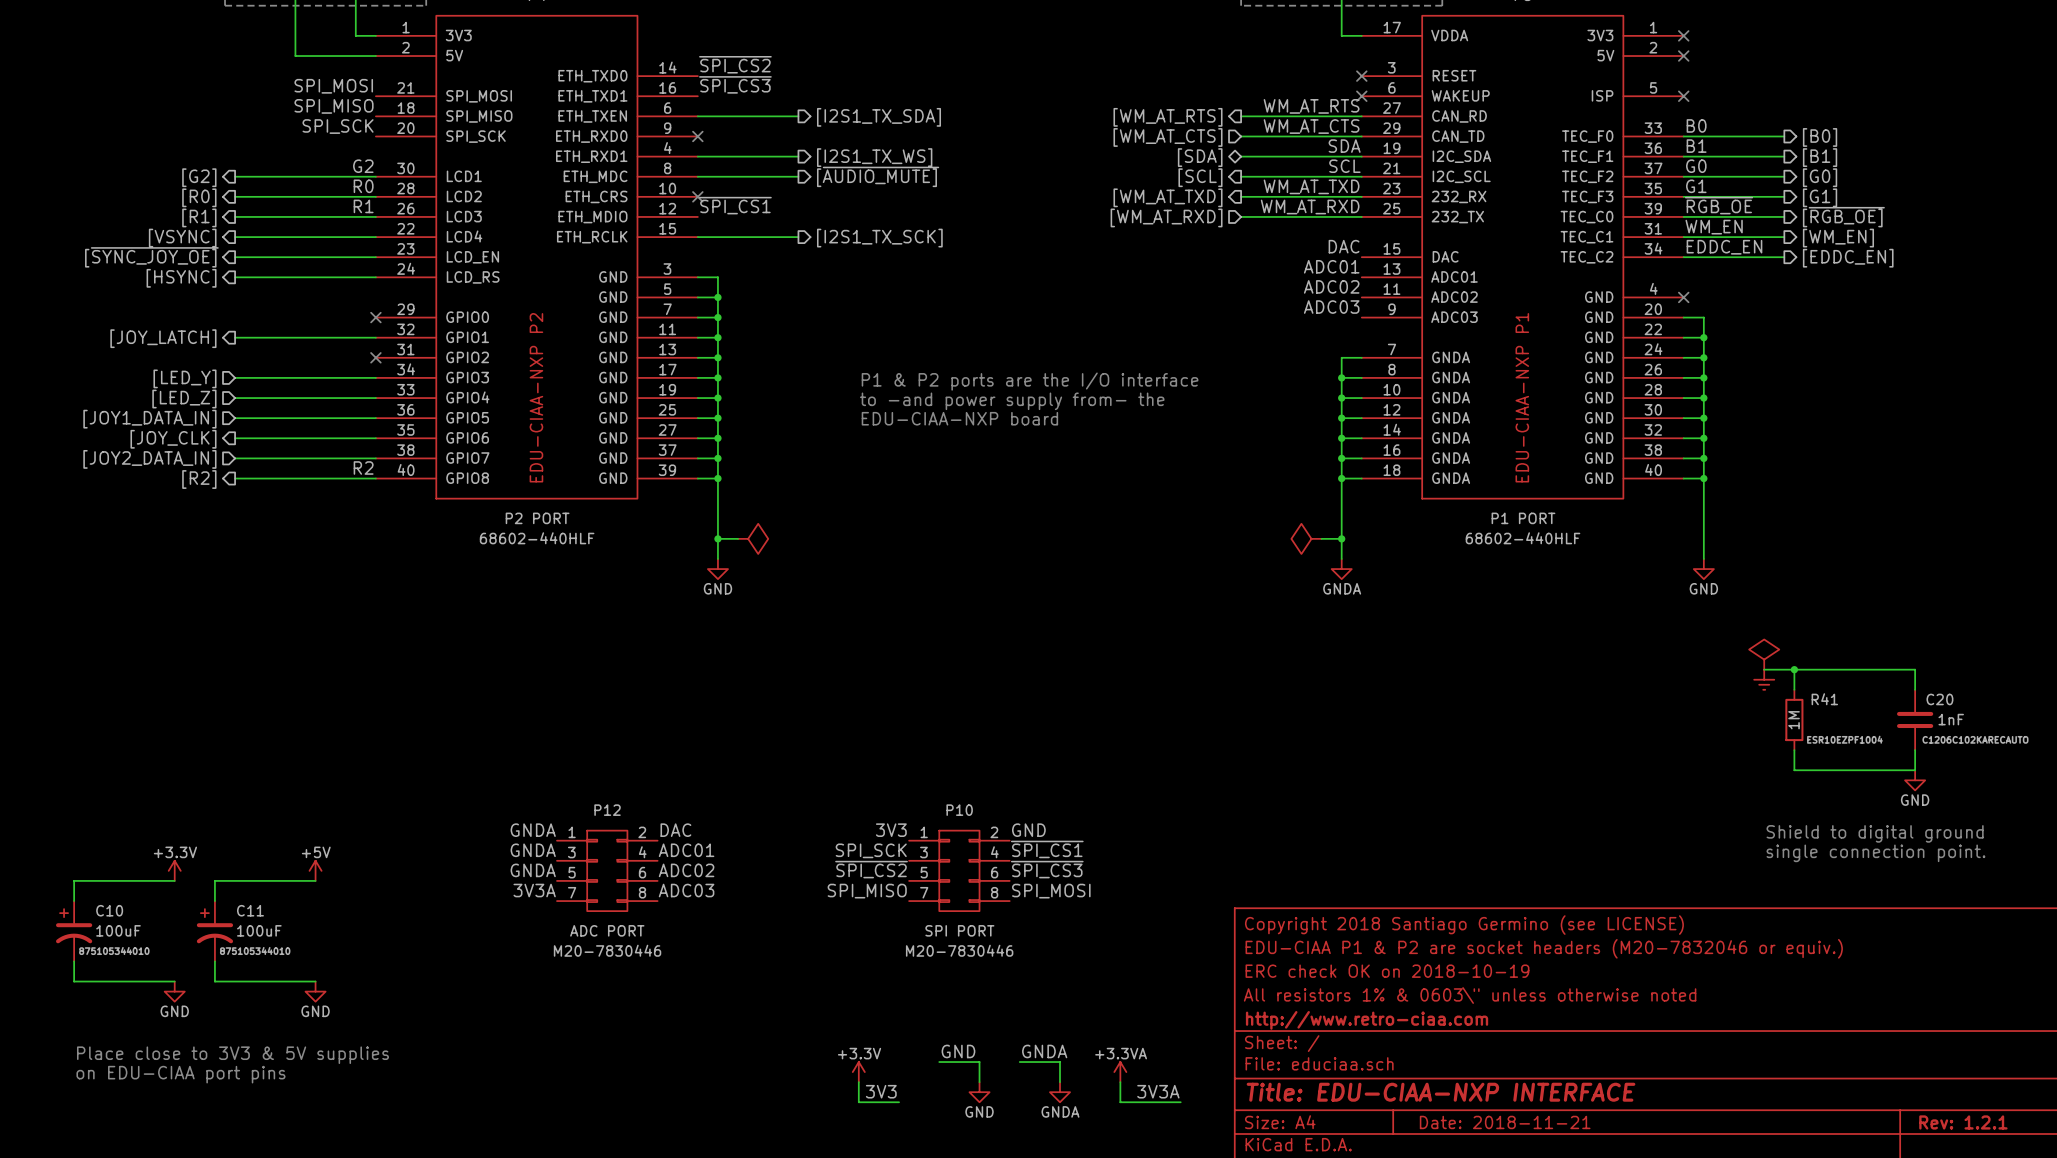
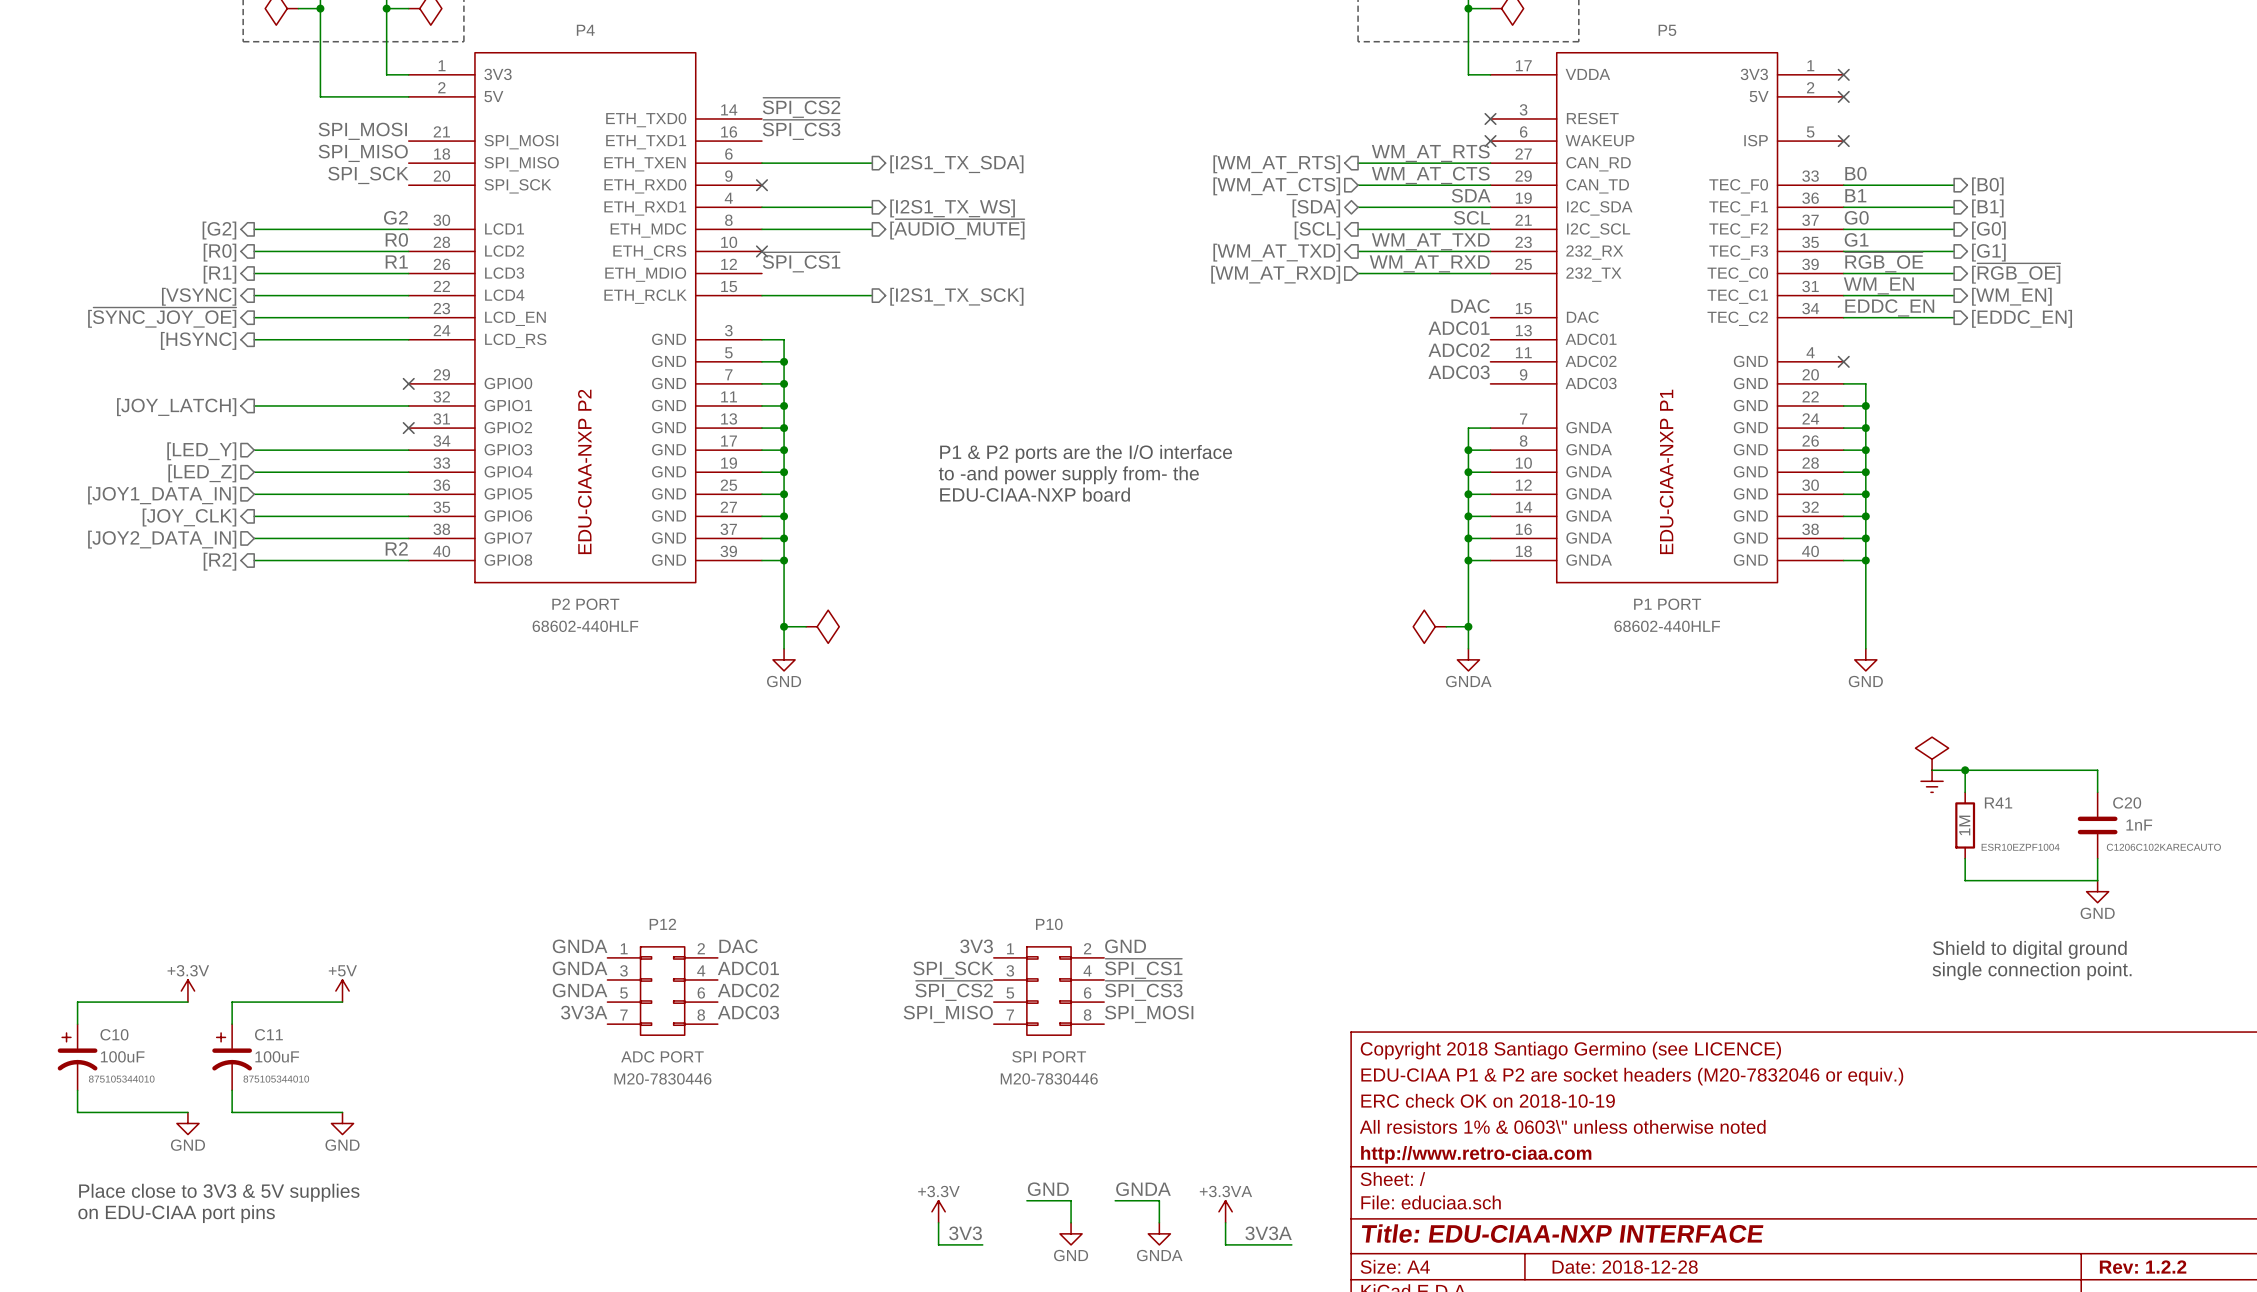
title block: Copyright 2018 Santiago Germino (see LICENSE) (1464, 925) -> Copyright 2018 Santiago Germino (see LICENCE) (1570, 1050)
title block: Date: 2018-11-21 (1505, 1122) -> Date: 2018-12-28 (1625, 1267)
title block: Rev: 1.2.1 (1963, 1122) -> Rev: 1.2.2 (2143, 1267)

